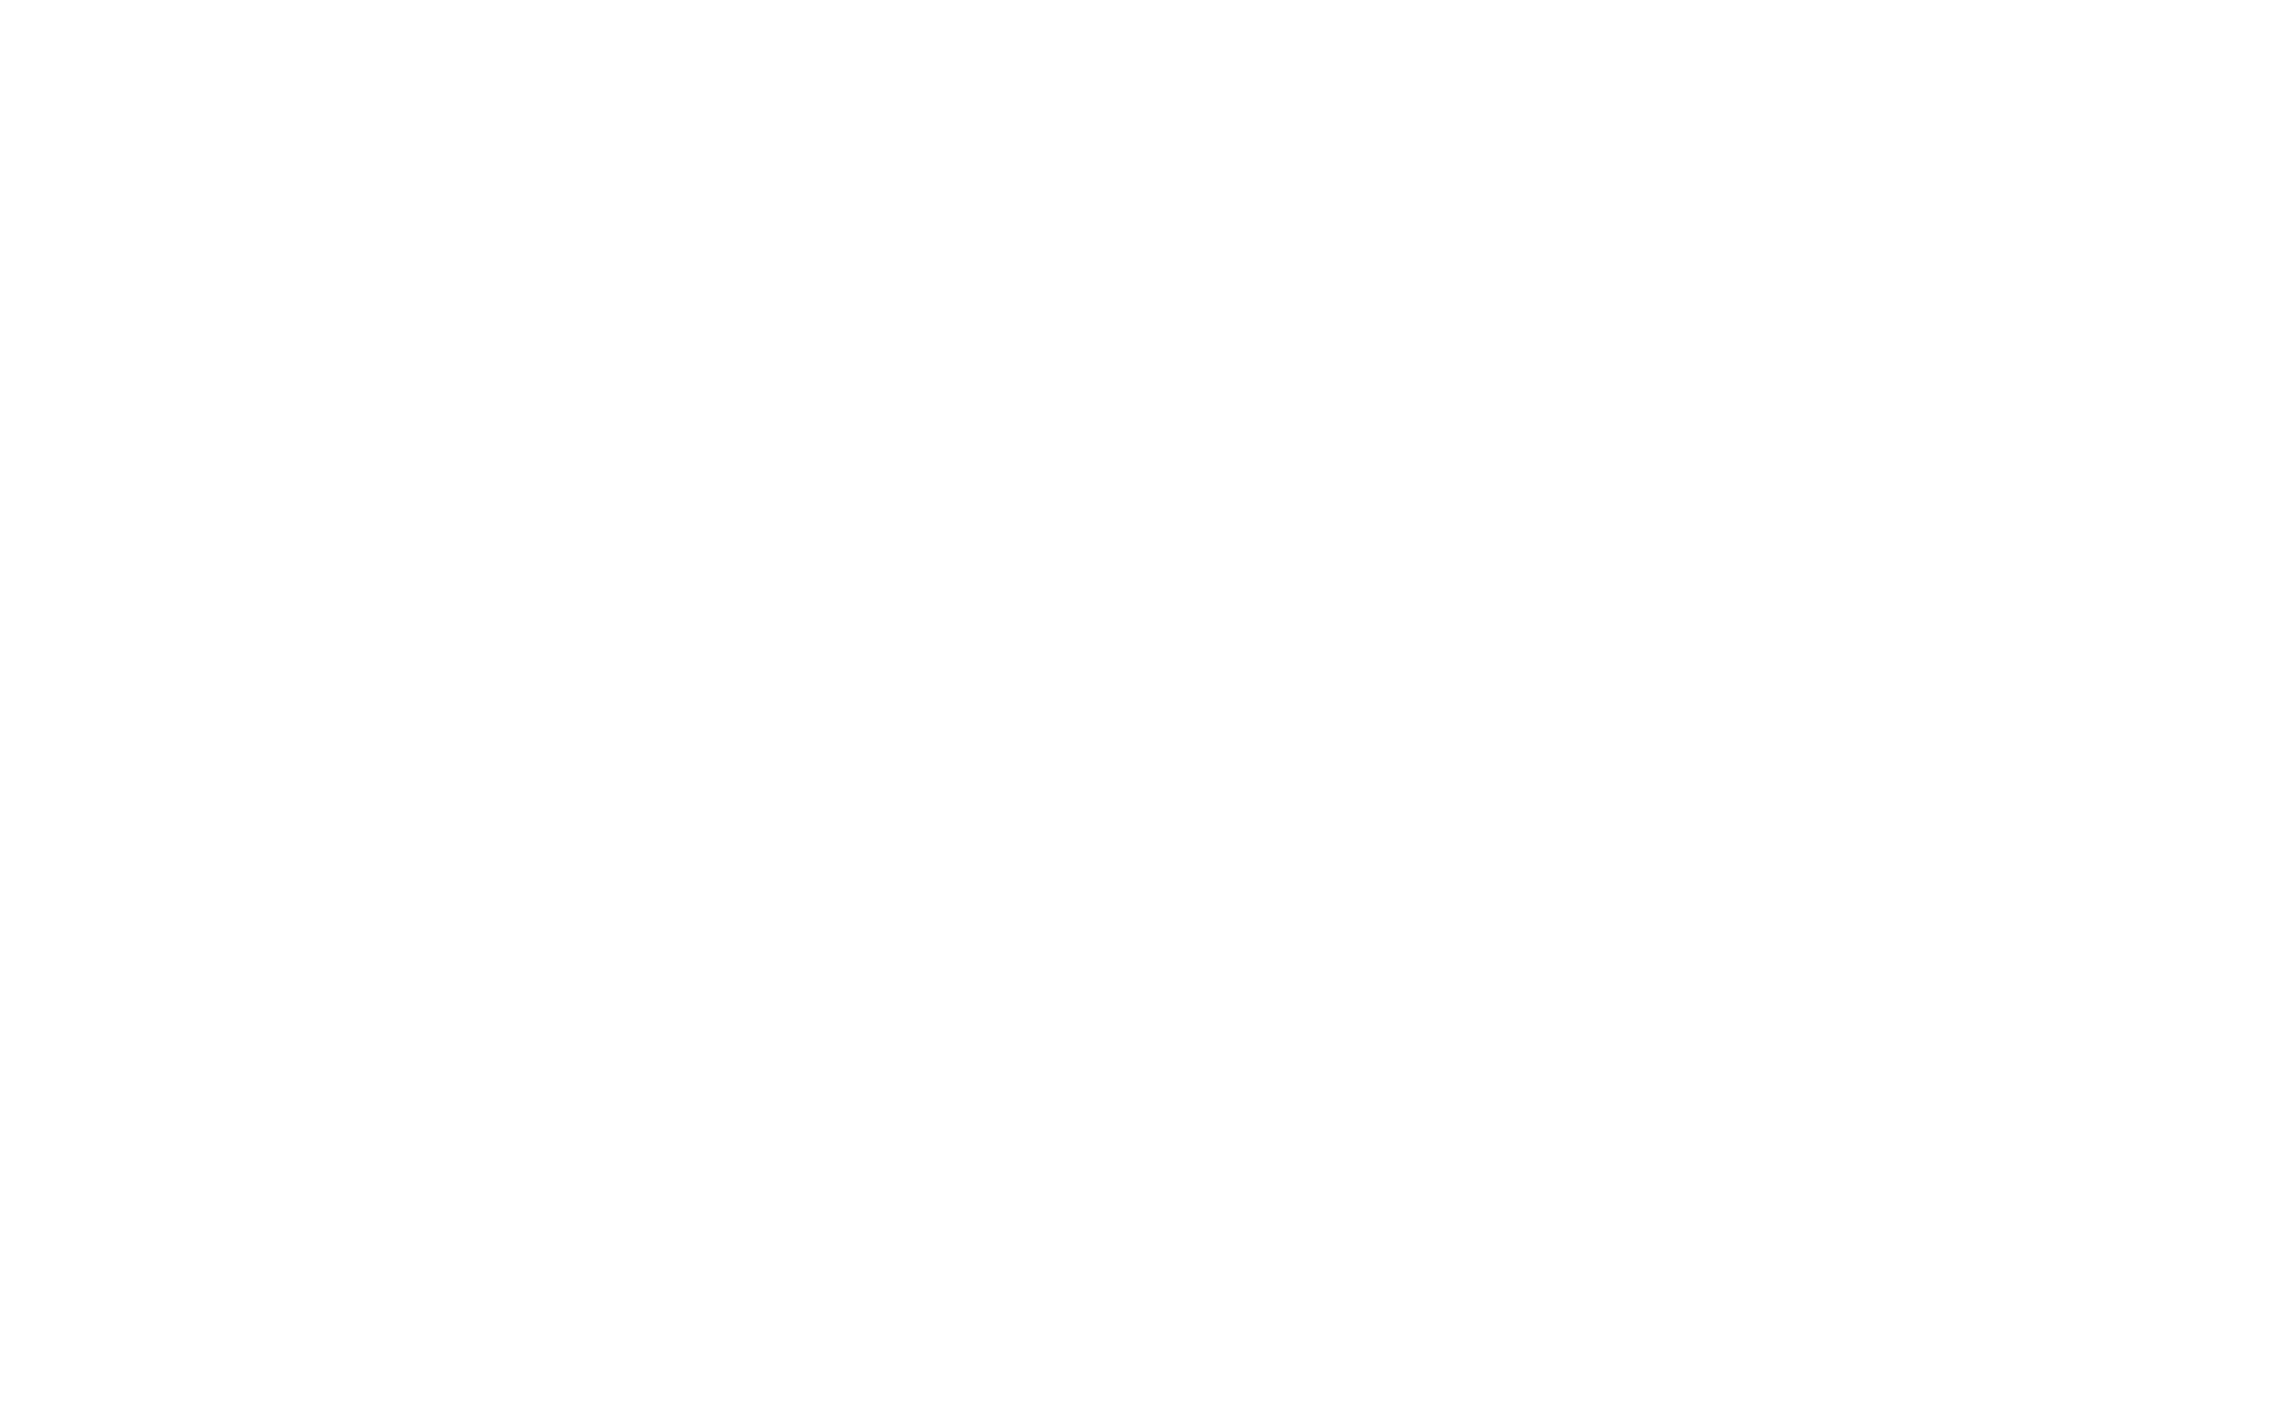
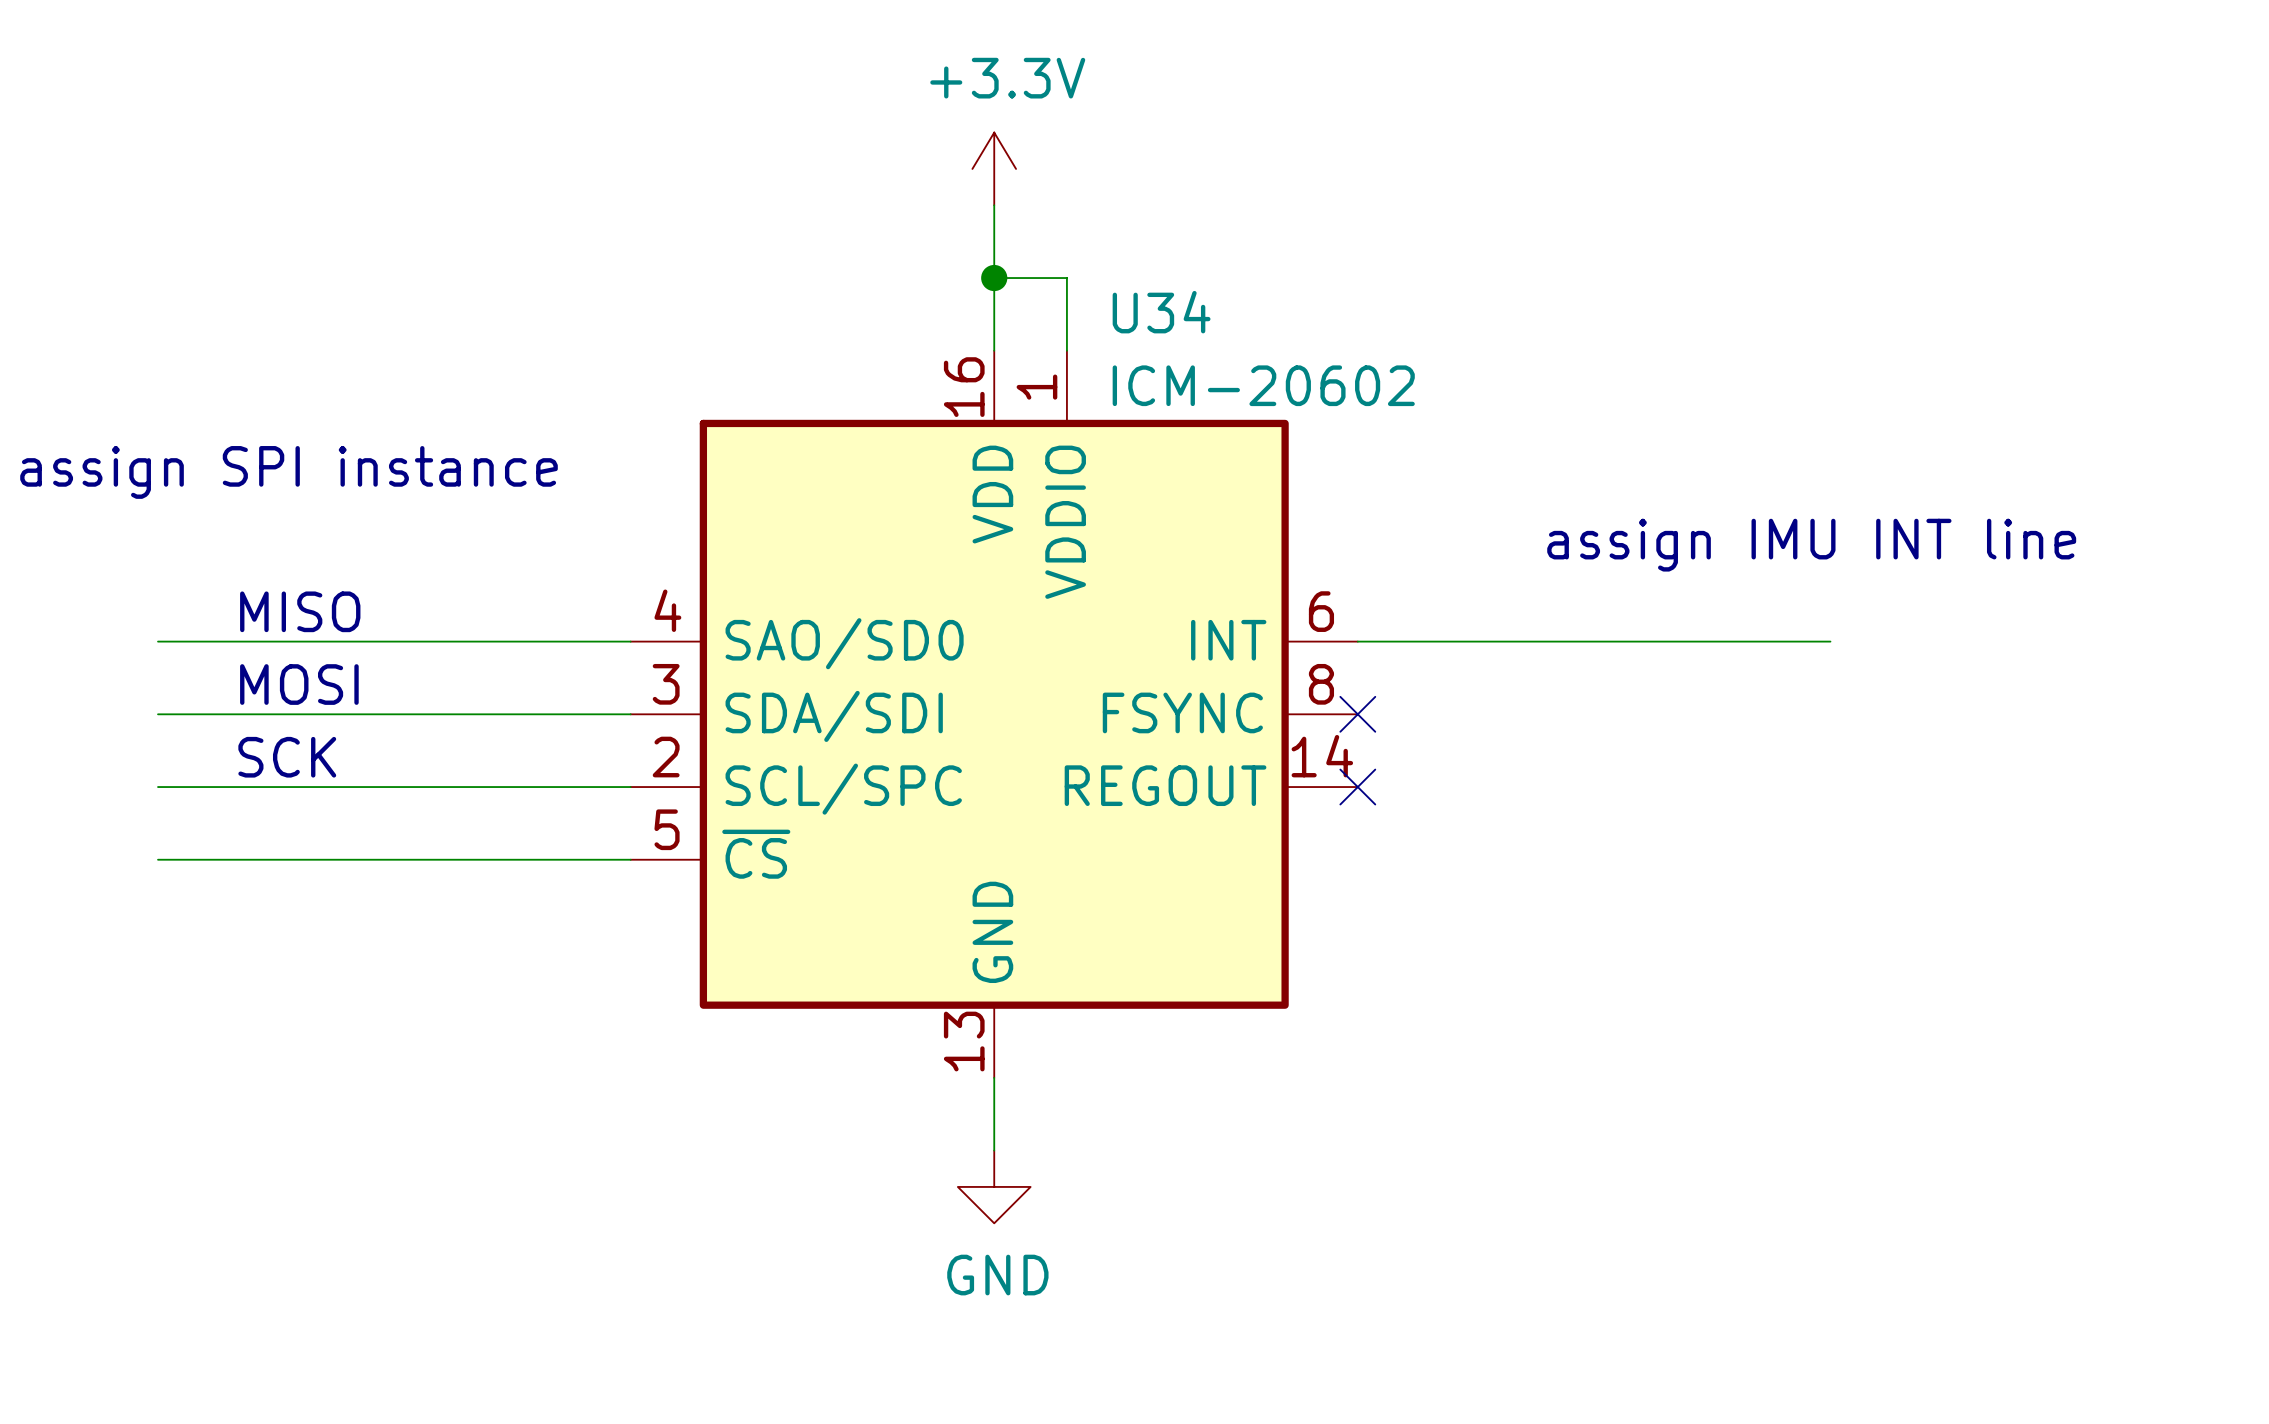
power symbol: none -> +3.3V (994, 168)
wire: none -> (994, 205) (994, 350)
wire: none -> (994, 278) (1066, 278) (1066, 350)
junction: none -> (994, 278)
text: none -> assign SPI instance (289, 472)
text: none -> assign IMU INT line (1811, 545)
text: none -> MISO (300, 611)
wire: none -> (158, 641) (630, 641)
wire: none -> (1357, 641) (1830, 641)
text: none -> MOSI (299, 684)
wire: none -> (158, 714) (630, 714)
U34: none -> ICM-20602 (994, 714)
no-connect mark: none -> (1357, 714)
text: none -> SCK (287, 757)
wire: none -> (158, 787) (630, 787)
no-connect mark: none -> (1357, 787)
wire: none -> (158, 859) (630, 859)
wire: none -> (994, 1077) (994, 1150)
power symbol: none -> GND (994, 1186)

